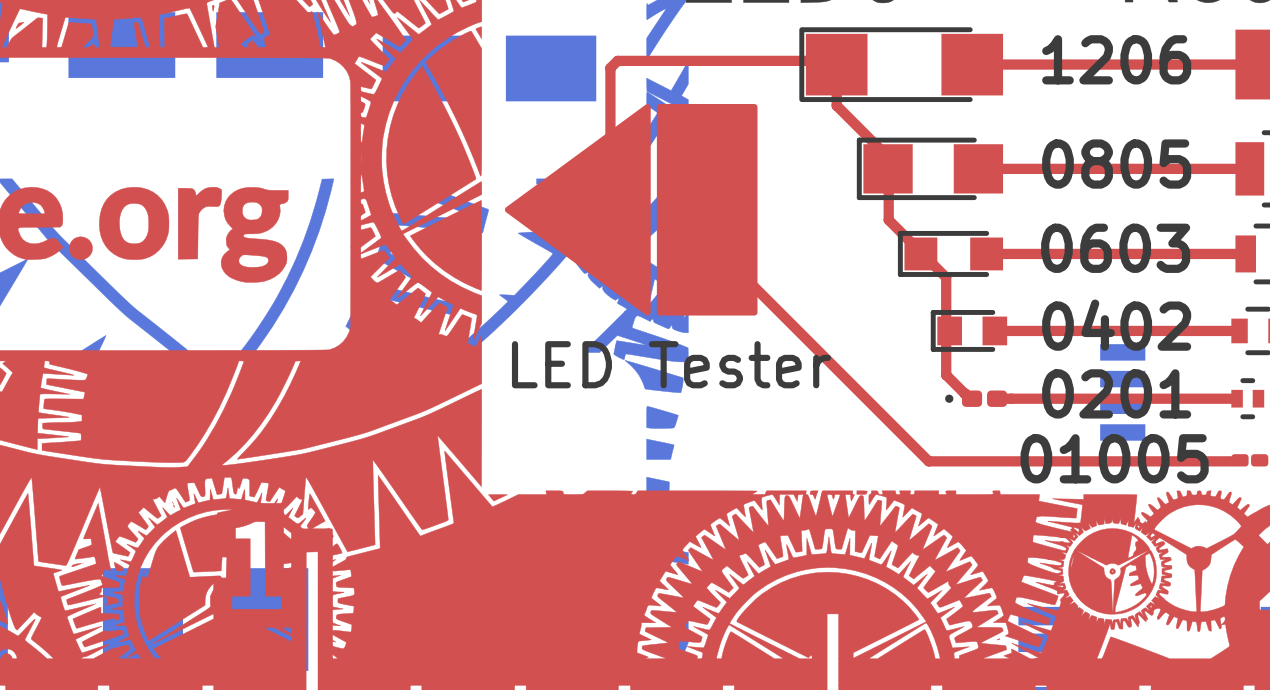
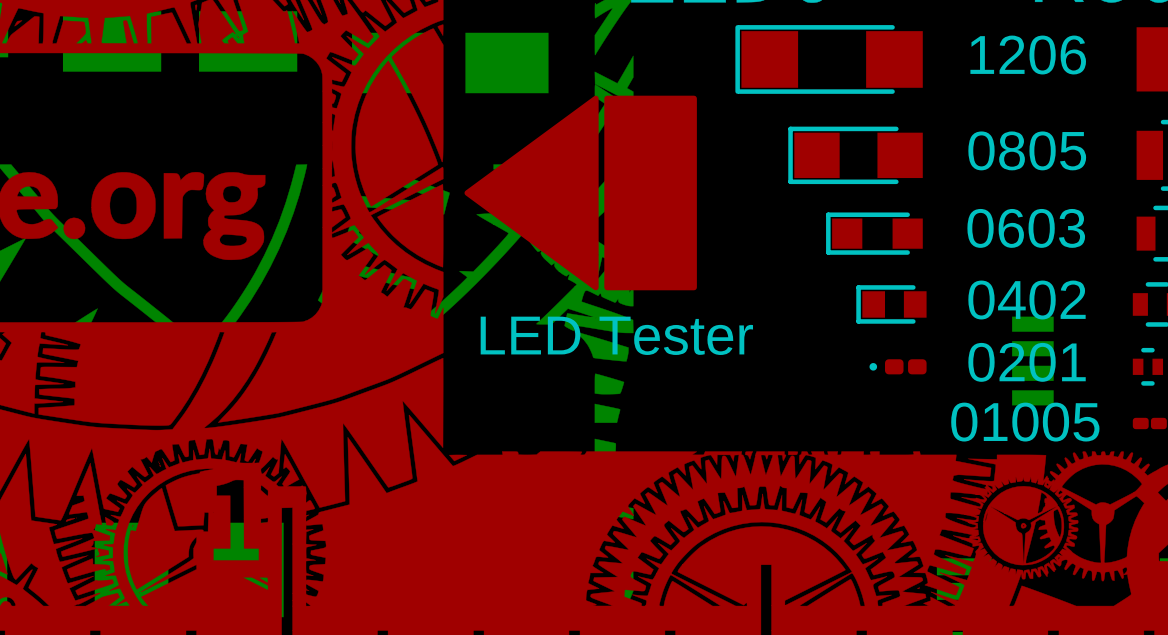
top track: (835, 60) (617, 60) (610, 68) (610, 176) (618, 185) (618, 209) -> none
top track: (836, 64) (836, 105) (888, 157) (888, 220) (946, 277) (946, 375) (965, 393) -> none
top track: (973, 64) (1253, 64) -> none
top track: (985, 168) (1249, 168) -> none
top track: (688, 209) (706, 227) (706, 238) (928, 461) (1232, 461) -> none
top track: (986, 253) (1242, 253) -> none
top track: (994, 330) (1236, 330) -> none
top track: (997, 398) (1235, 398) -> none

